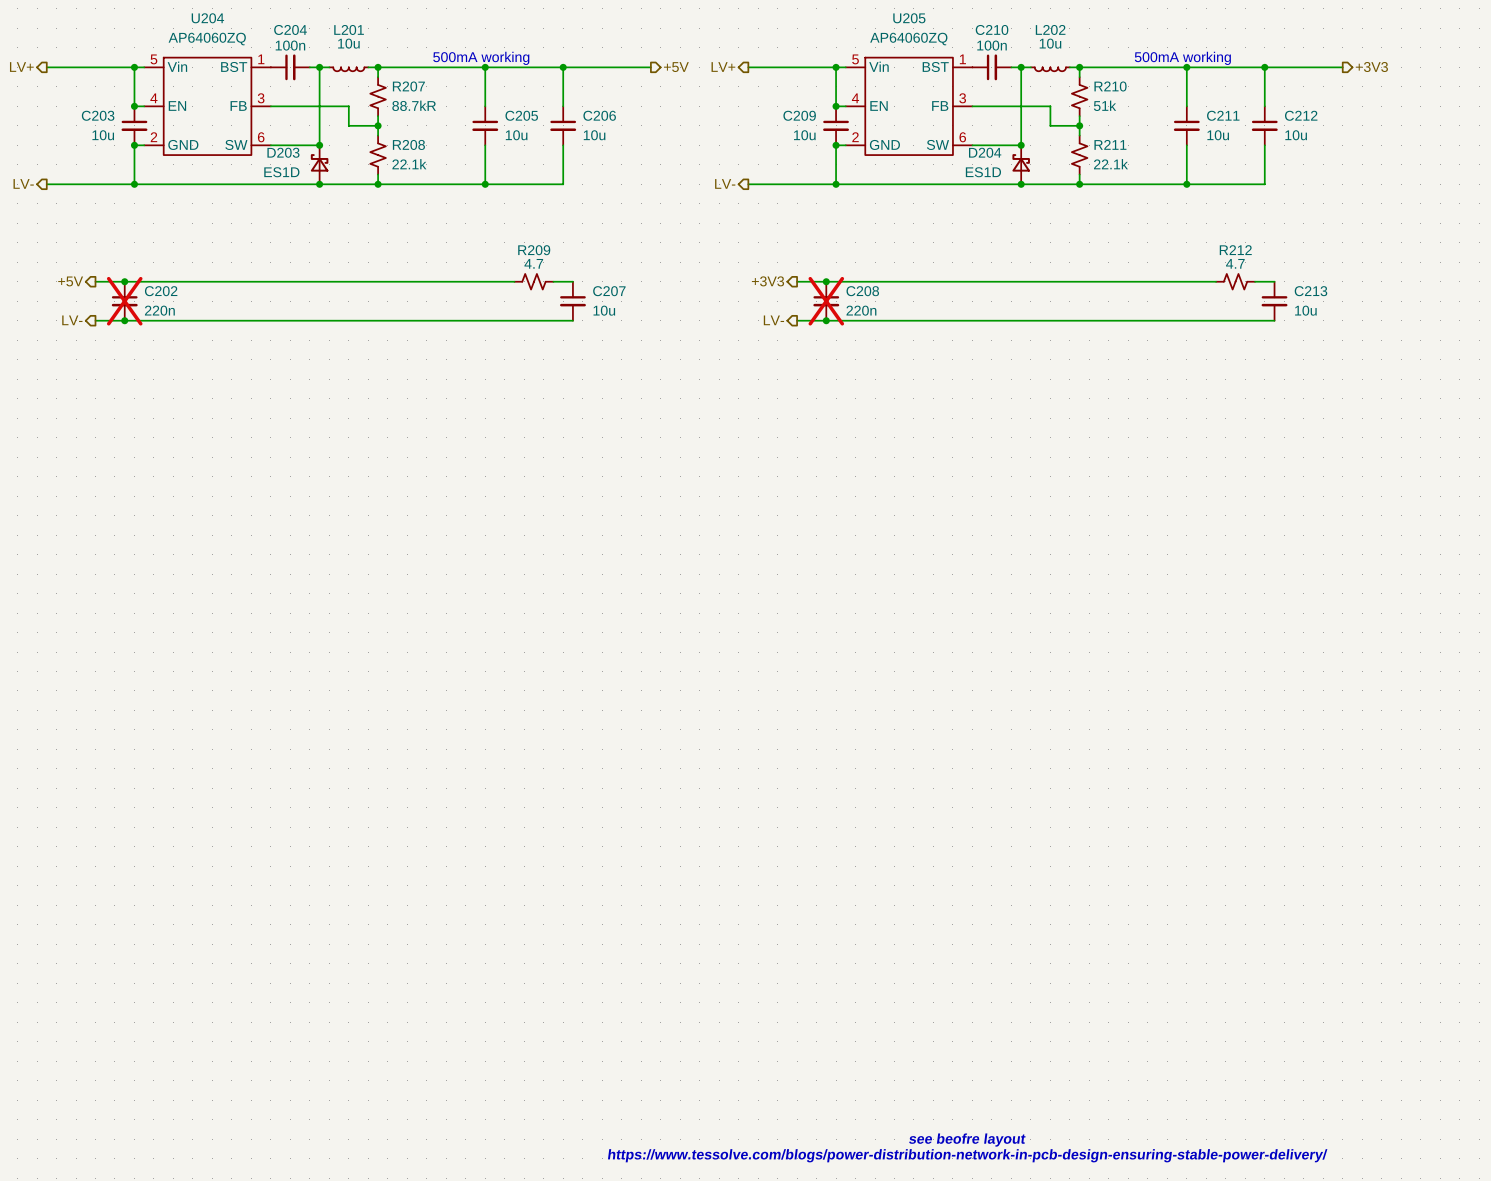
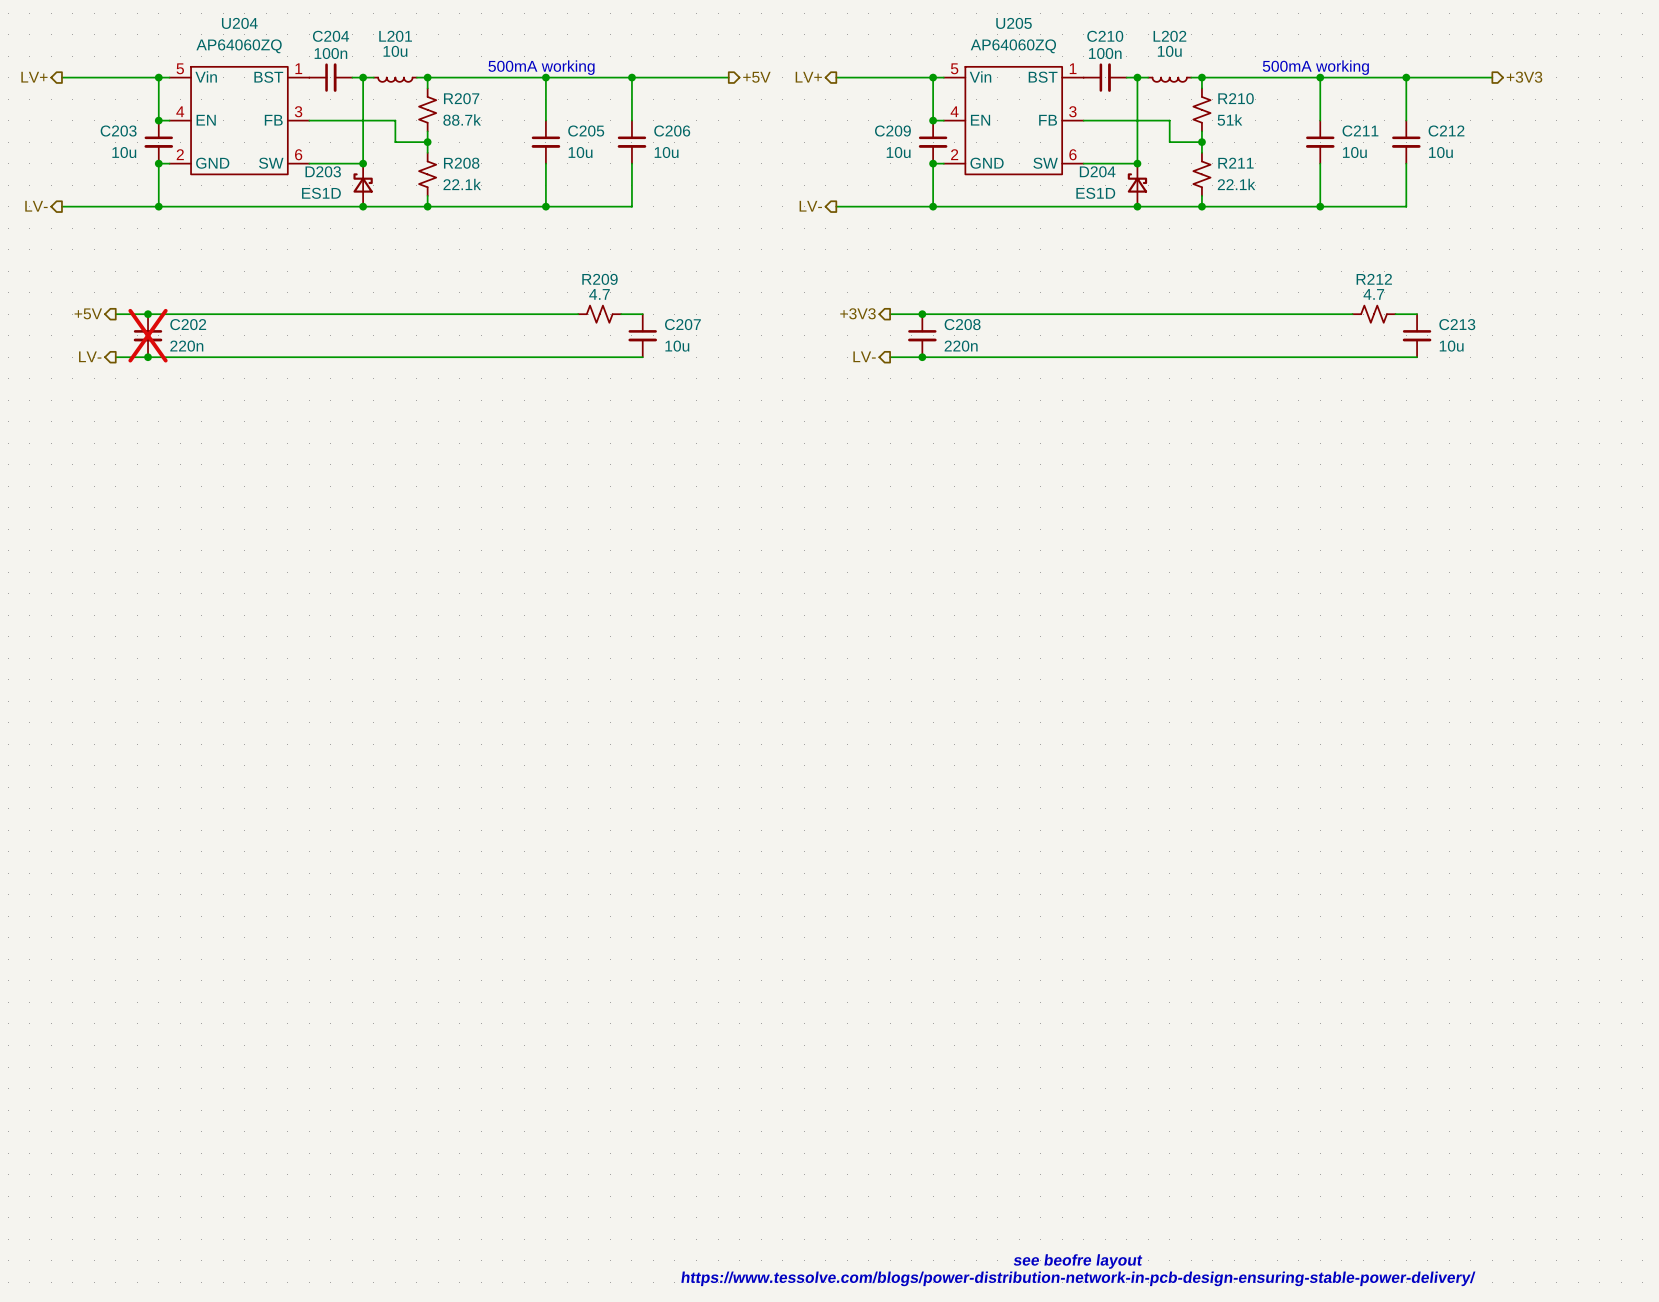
R207 value: 88.7kR (414, 105) -> 88.7k (462, 120)
C208 do-not-place cross: (826, 301) -> none

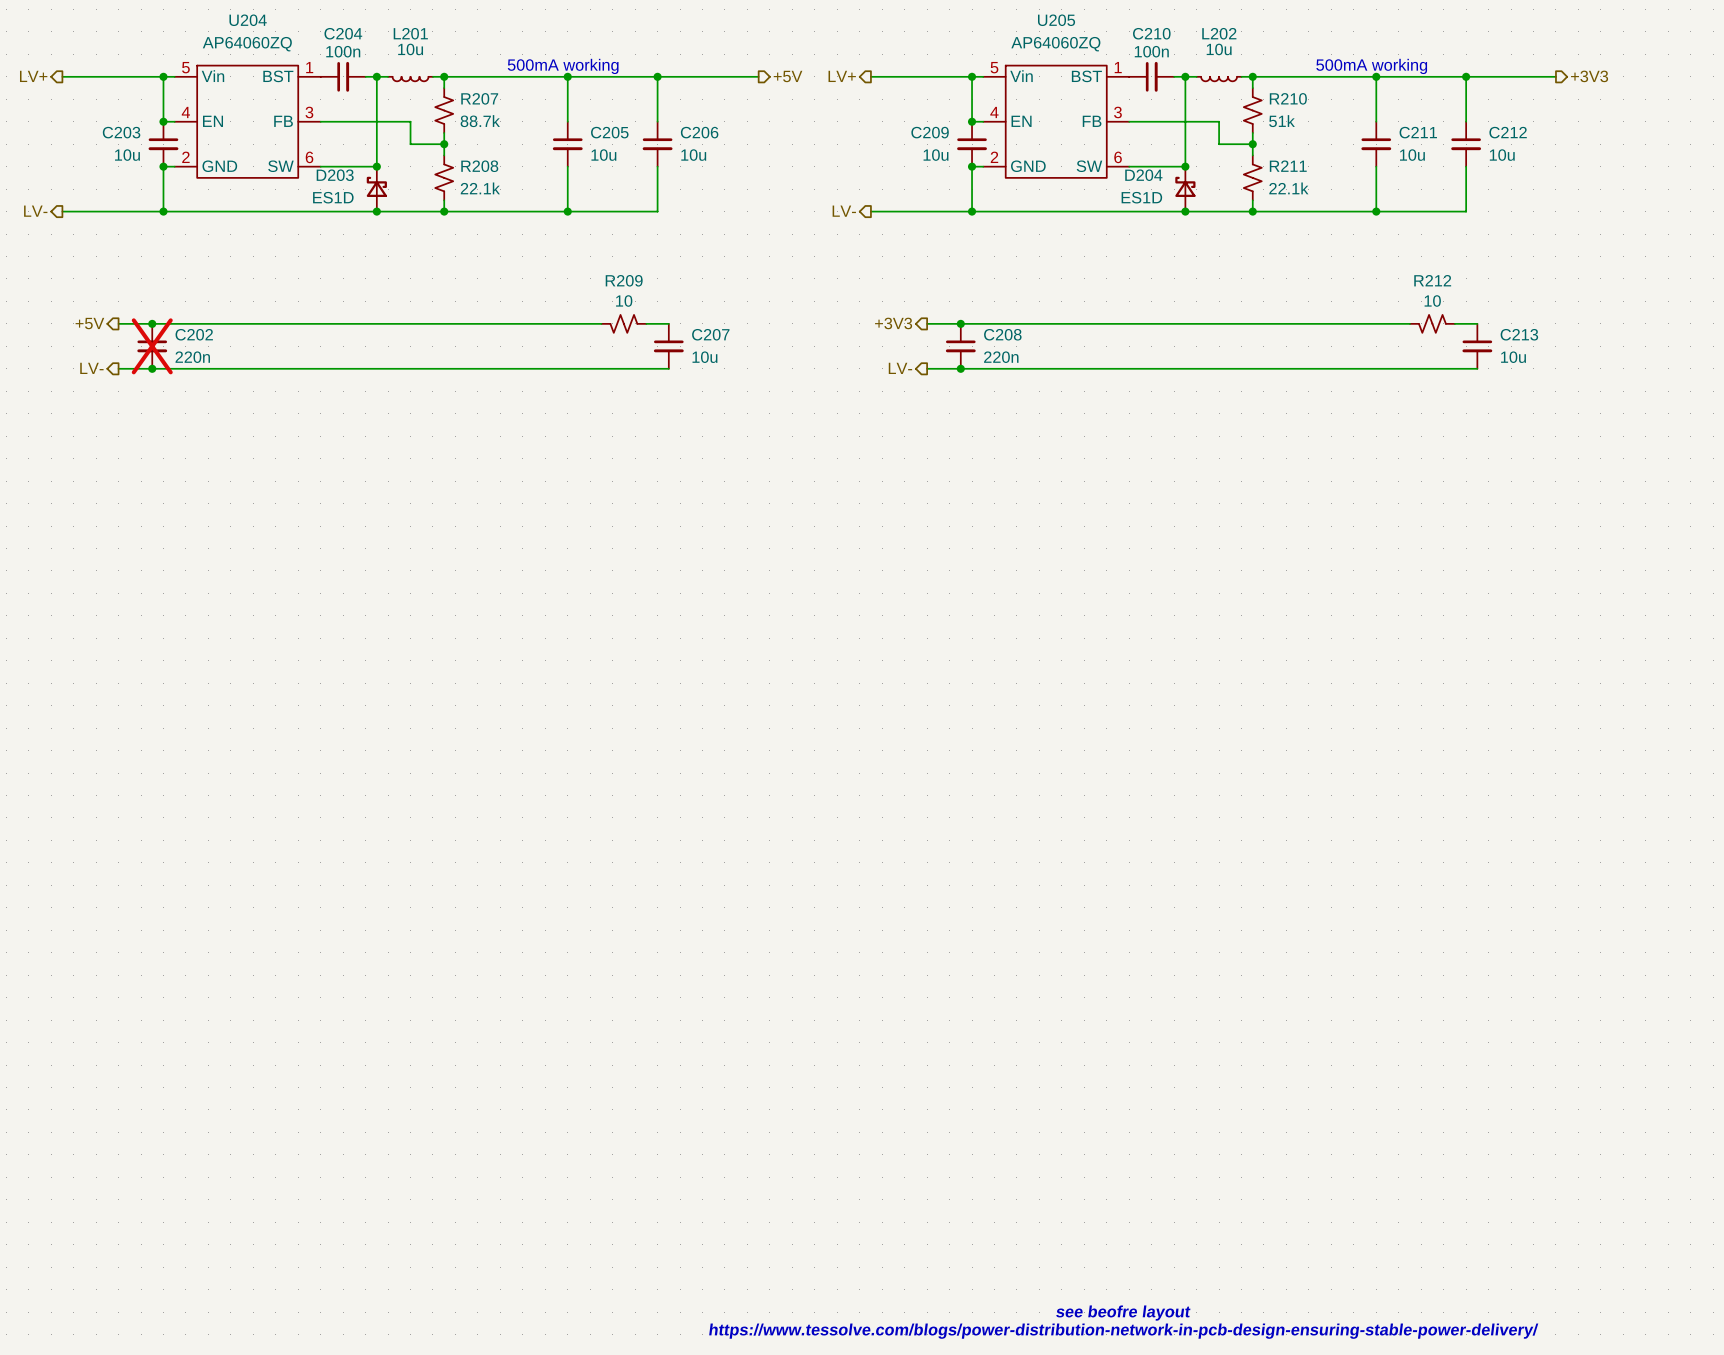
R209 value: 4.7 (599, 294) -> 10 (624, 301)
R212 value: 4.7 (1373, 294) -> 10 (1432, 301)
R209 flip: as is (599, 314) -> left-right (623, 323)
R212 flip: as is (1374, 314) -> left-right (1432, 323)

